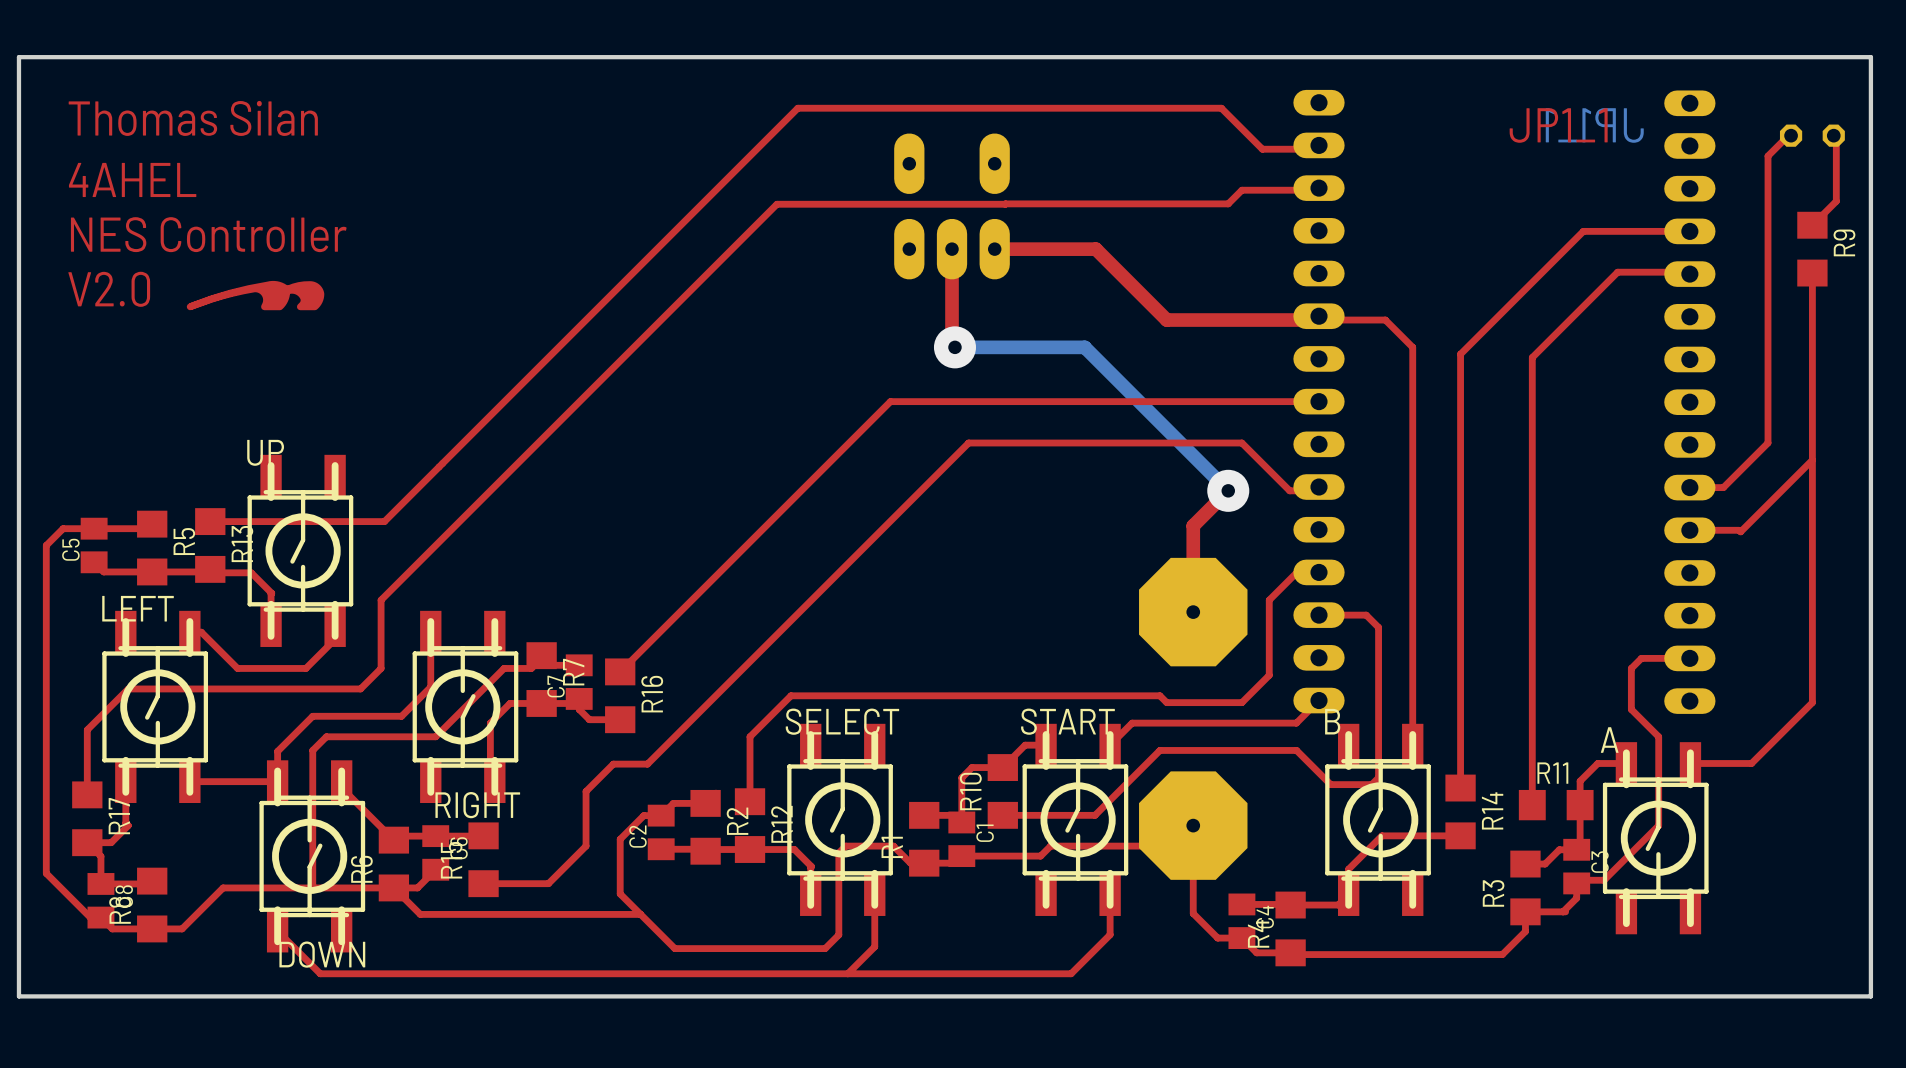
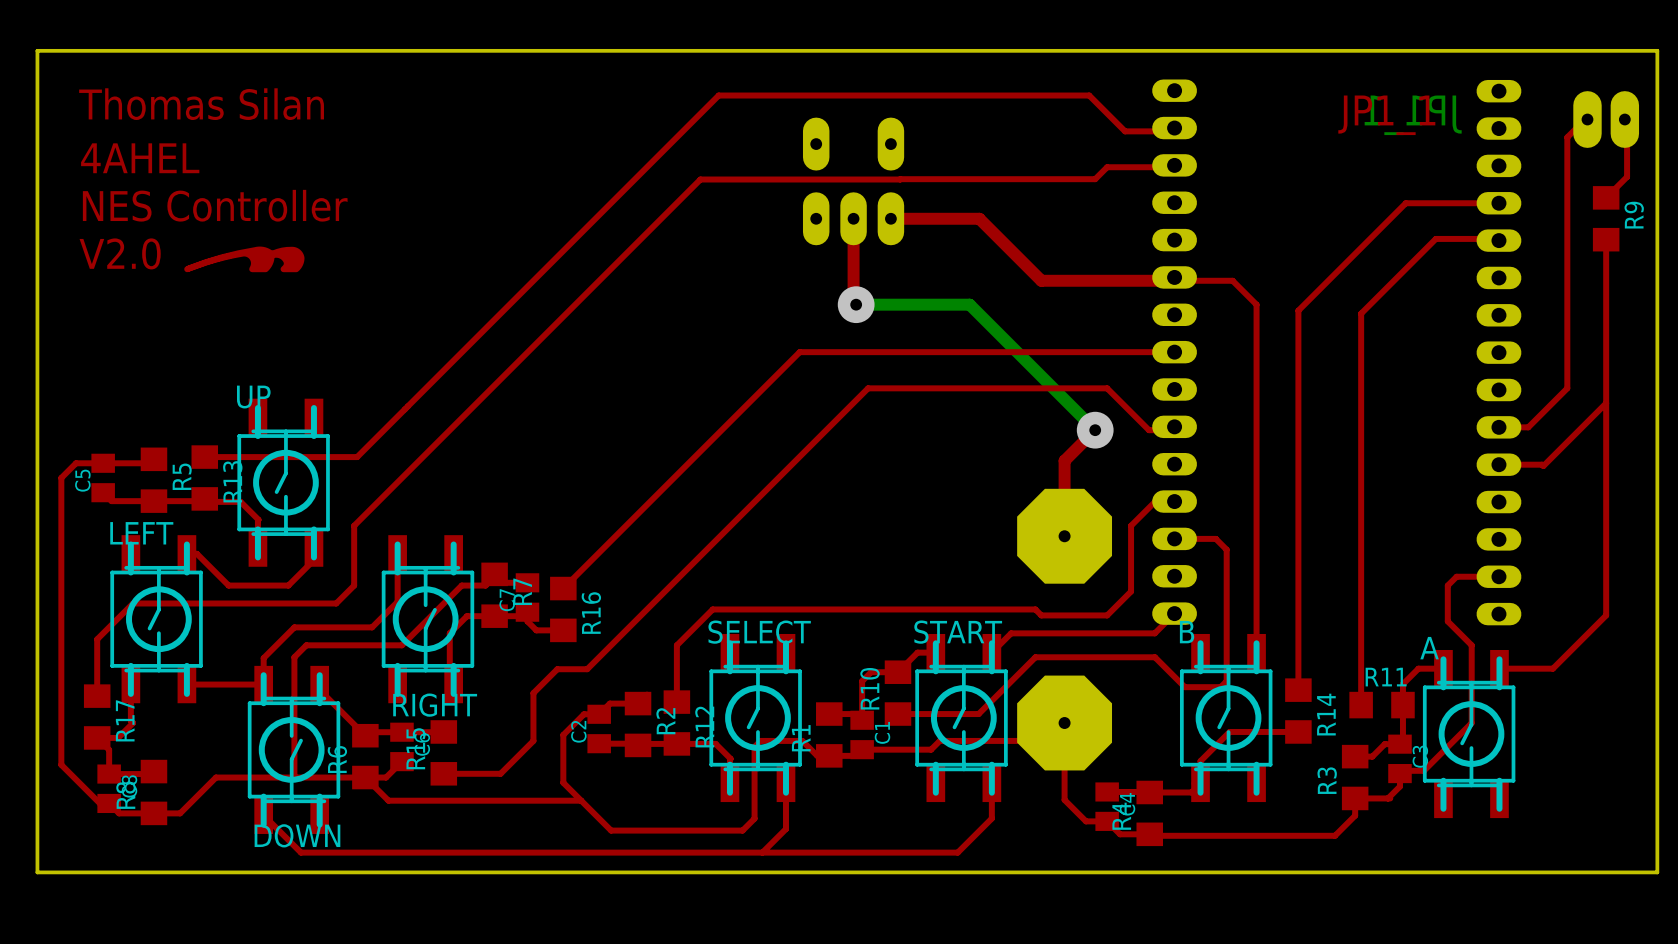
part footprint: [1779, 124, 1845, 147] -> [1573, 91, 1640, 148]

